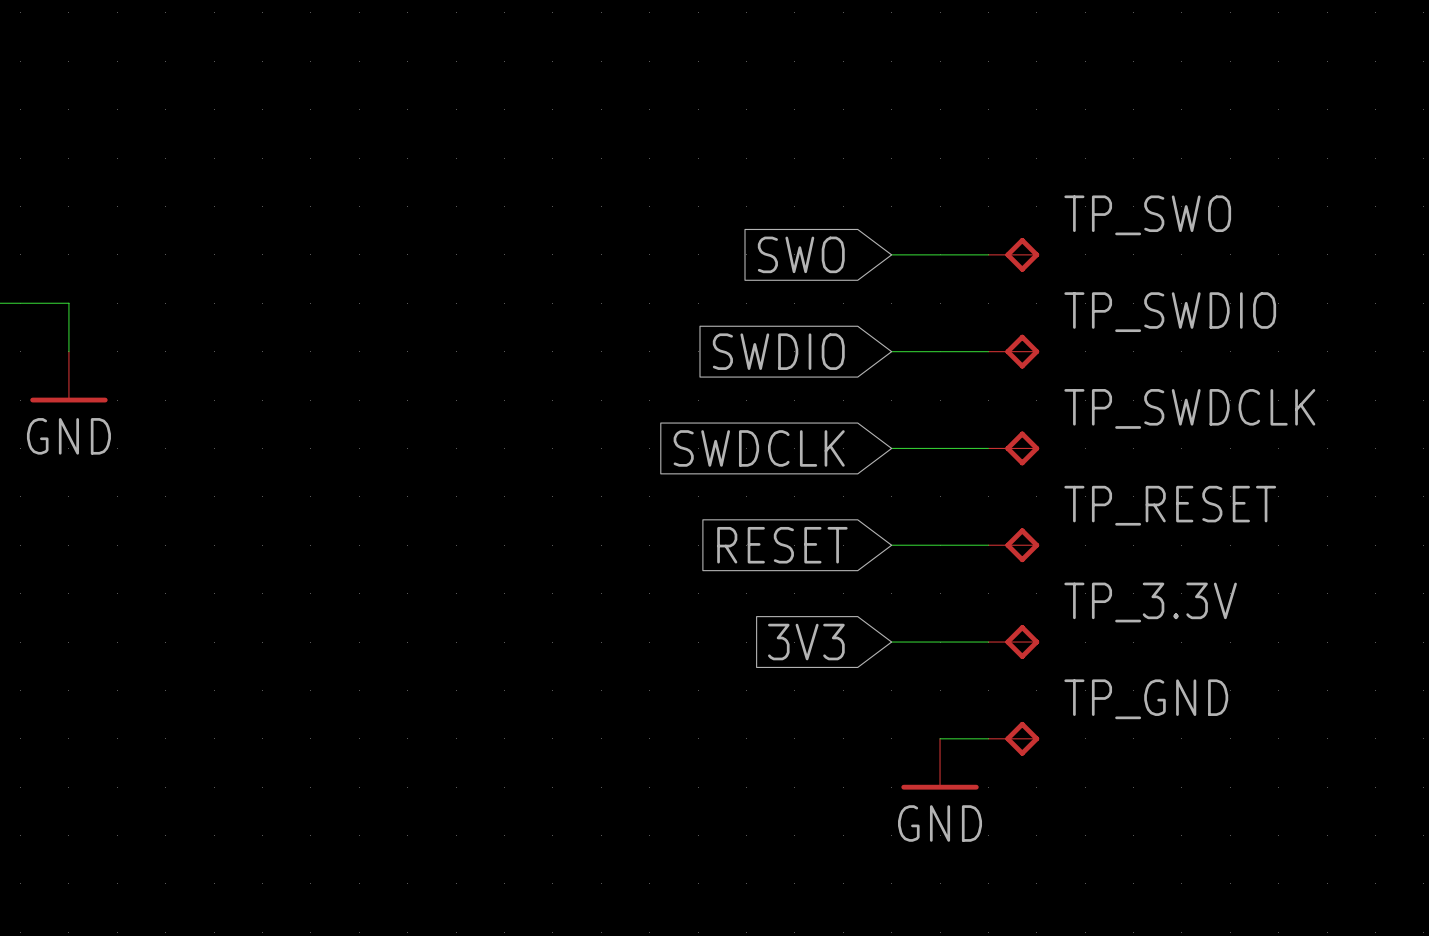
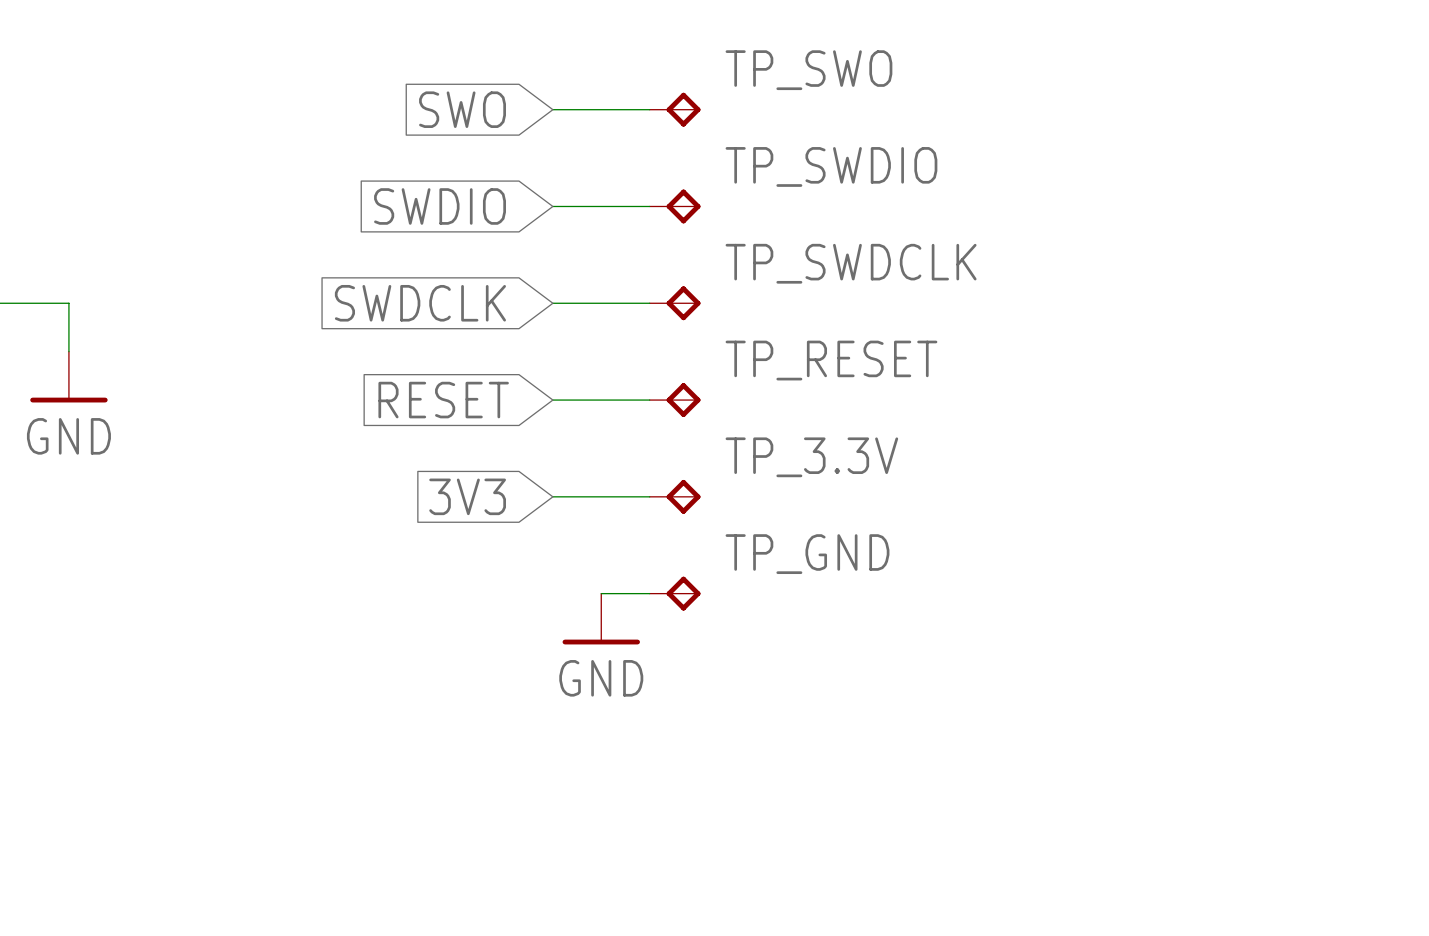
global label position: SWO (801, 254) -> SWO (462, 109)
wire: (891, 254) (988, 254) -> (552, 109) (649, 109)
TP_SWO position: (1013, 254) -> (675, 109)
global label position: SWDIO (778, 351) -> SWDIO (440, 206)
wire: (891, 351) (988, 351) -> (552, 206) (649, 206)
TP_SWDIO position: (1013, 351) -> (675, 206)
global label position: SWDCLK (759, 448) -> SWDCLK (420, 303)
wire: (891, 448) (988, 448) -> (552, 303) (649, 303)
TP_SWDCLK position: (1013, 448) -> (675, 303)
global label position: RESET (782, 545) -> RESET (443, 400)
wire: (891, 545) (988, 545) -> (552, 400) (649, 400)
TP_RESET position: (1013, 545) -> (675, 400)
global label position: 3V3 (806, 642) -> 3V3 (467, 496)
wire: (891, 642) (988, 642) -> (552, 496) (649, 496)
TP_3.3V position: (1013, 642) -> (675, 496)
wire: (940, 738) (988, 738) -> (601, 593) (649, 593)
TP_GND position: (1013, 738) -> (675, 593)
power symbol position: GND (940, 764) -> GND (601, 619)

